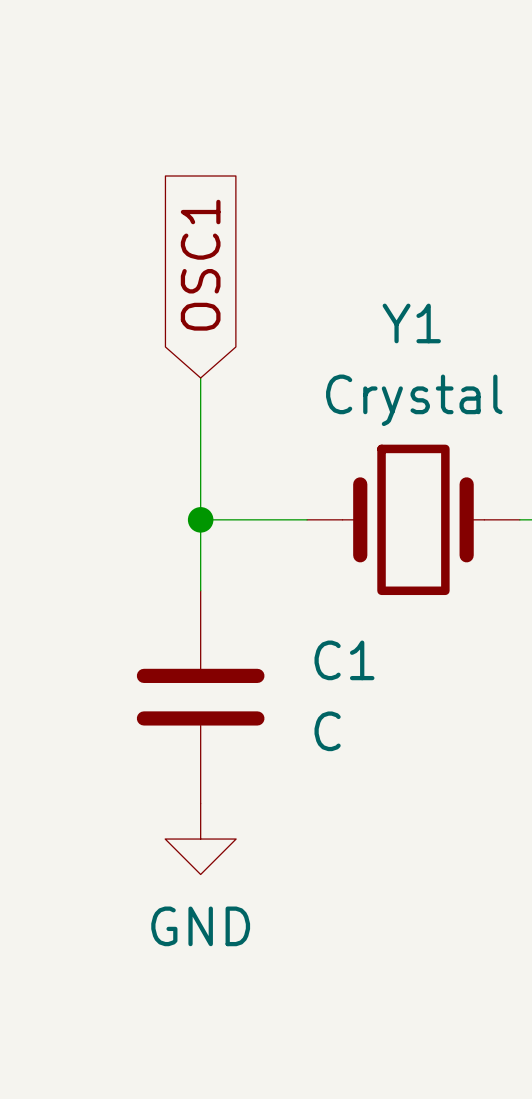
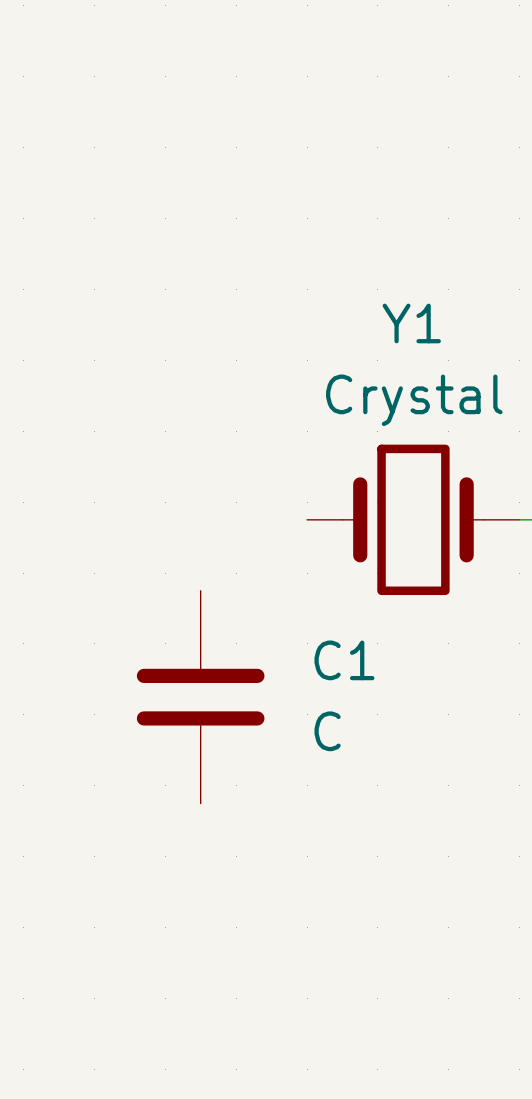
global label: OSC1 (200, 265) -> none
wire: (200, 377) (200, 590) -> none
wire: (200, 519) (307, 519) -> none
junction: (200, 519) -> none
power symbol: GND (200, 839) -> none

